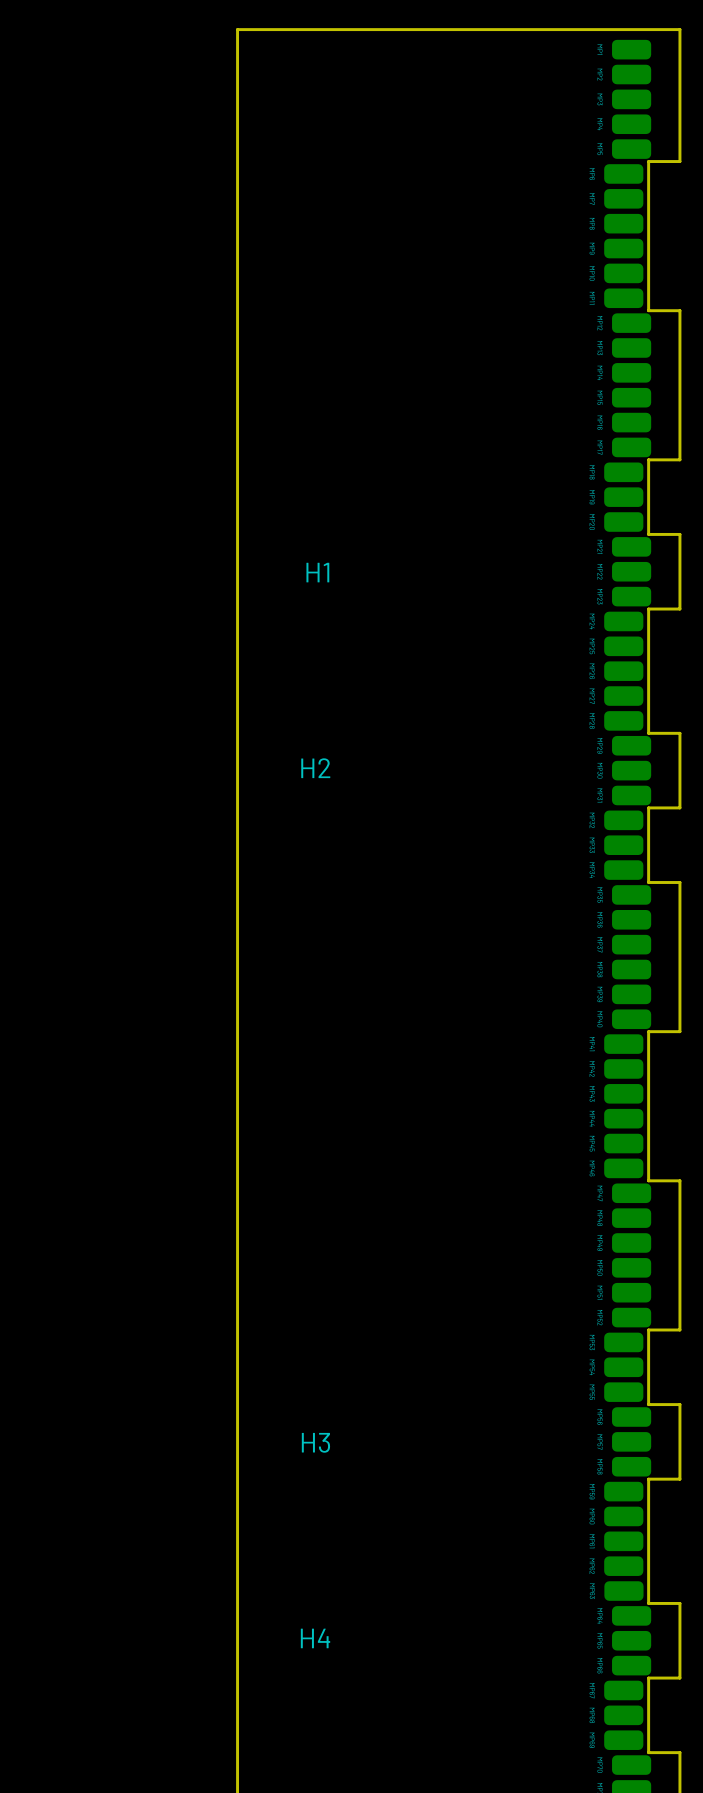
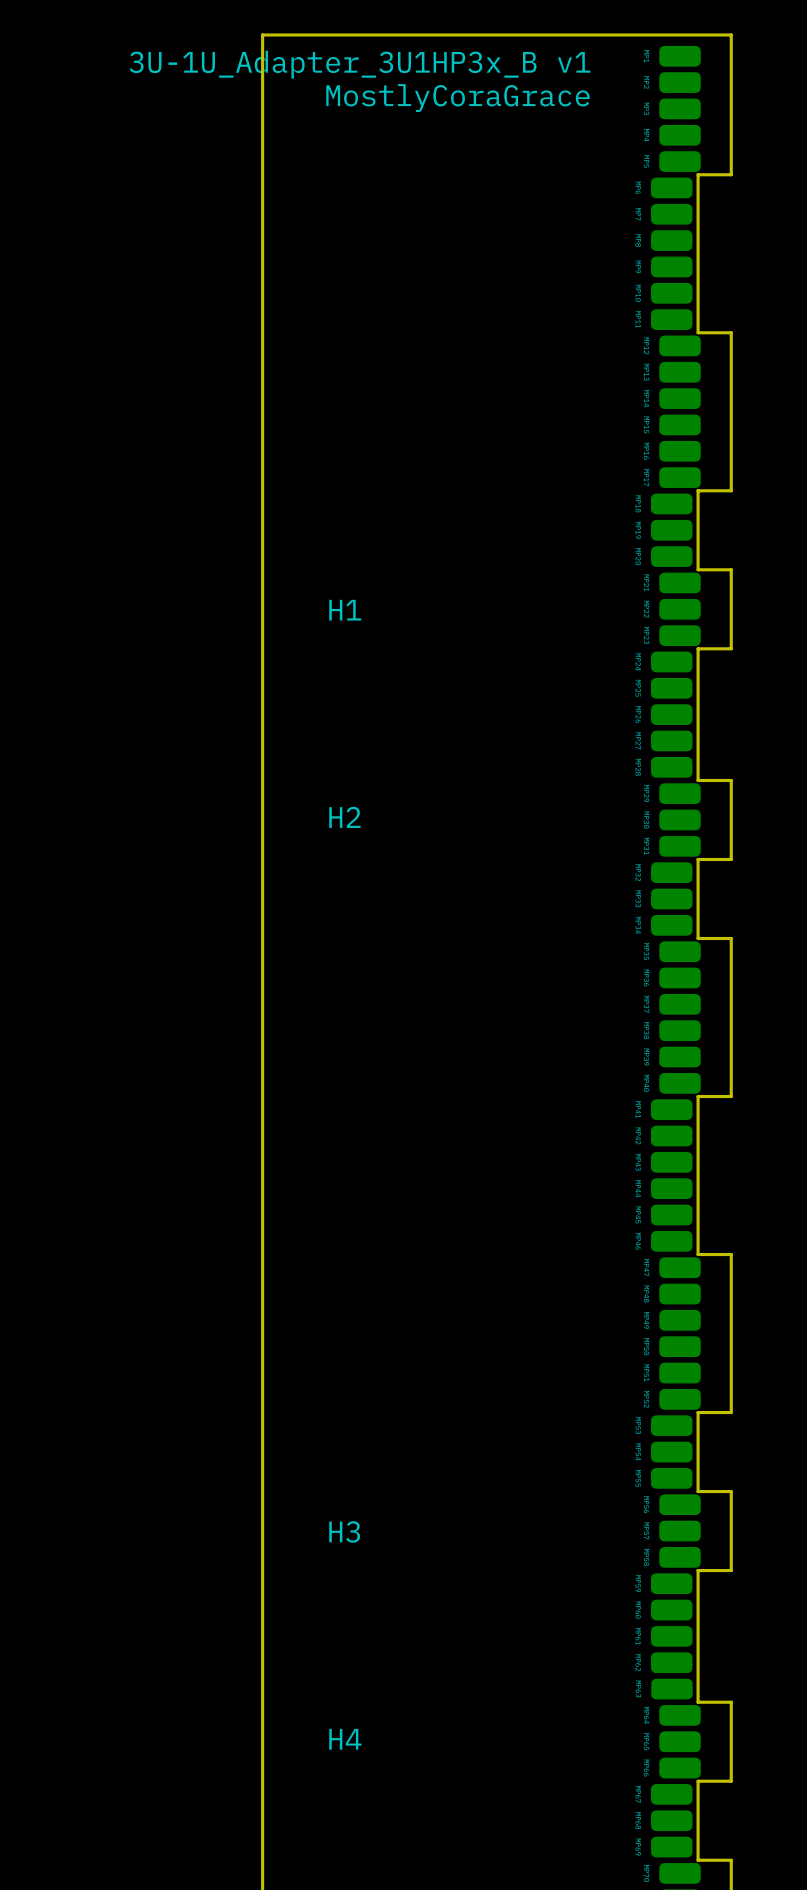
text: none -> 3U-1U_Adapter_3U1HP3x_B v1 (359, 64)
text: none -> MostlyCoraGrace (458, 98)

